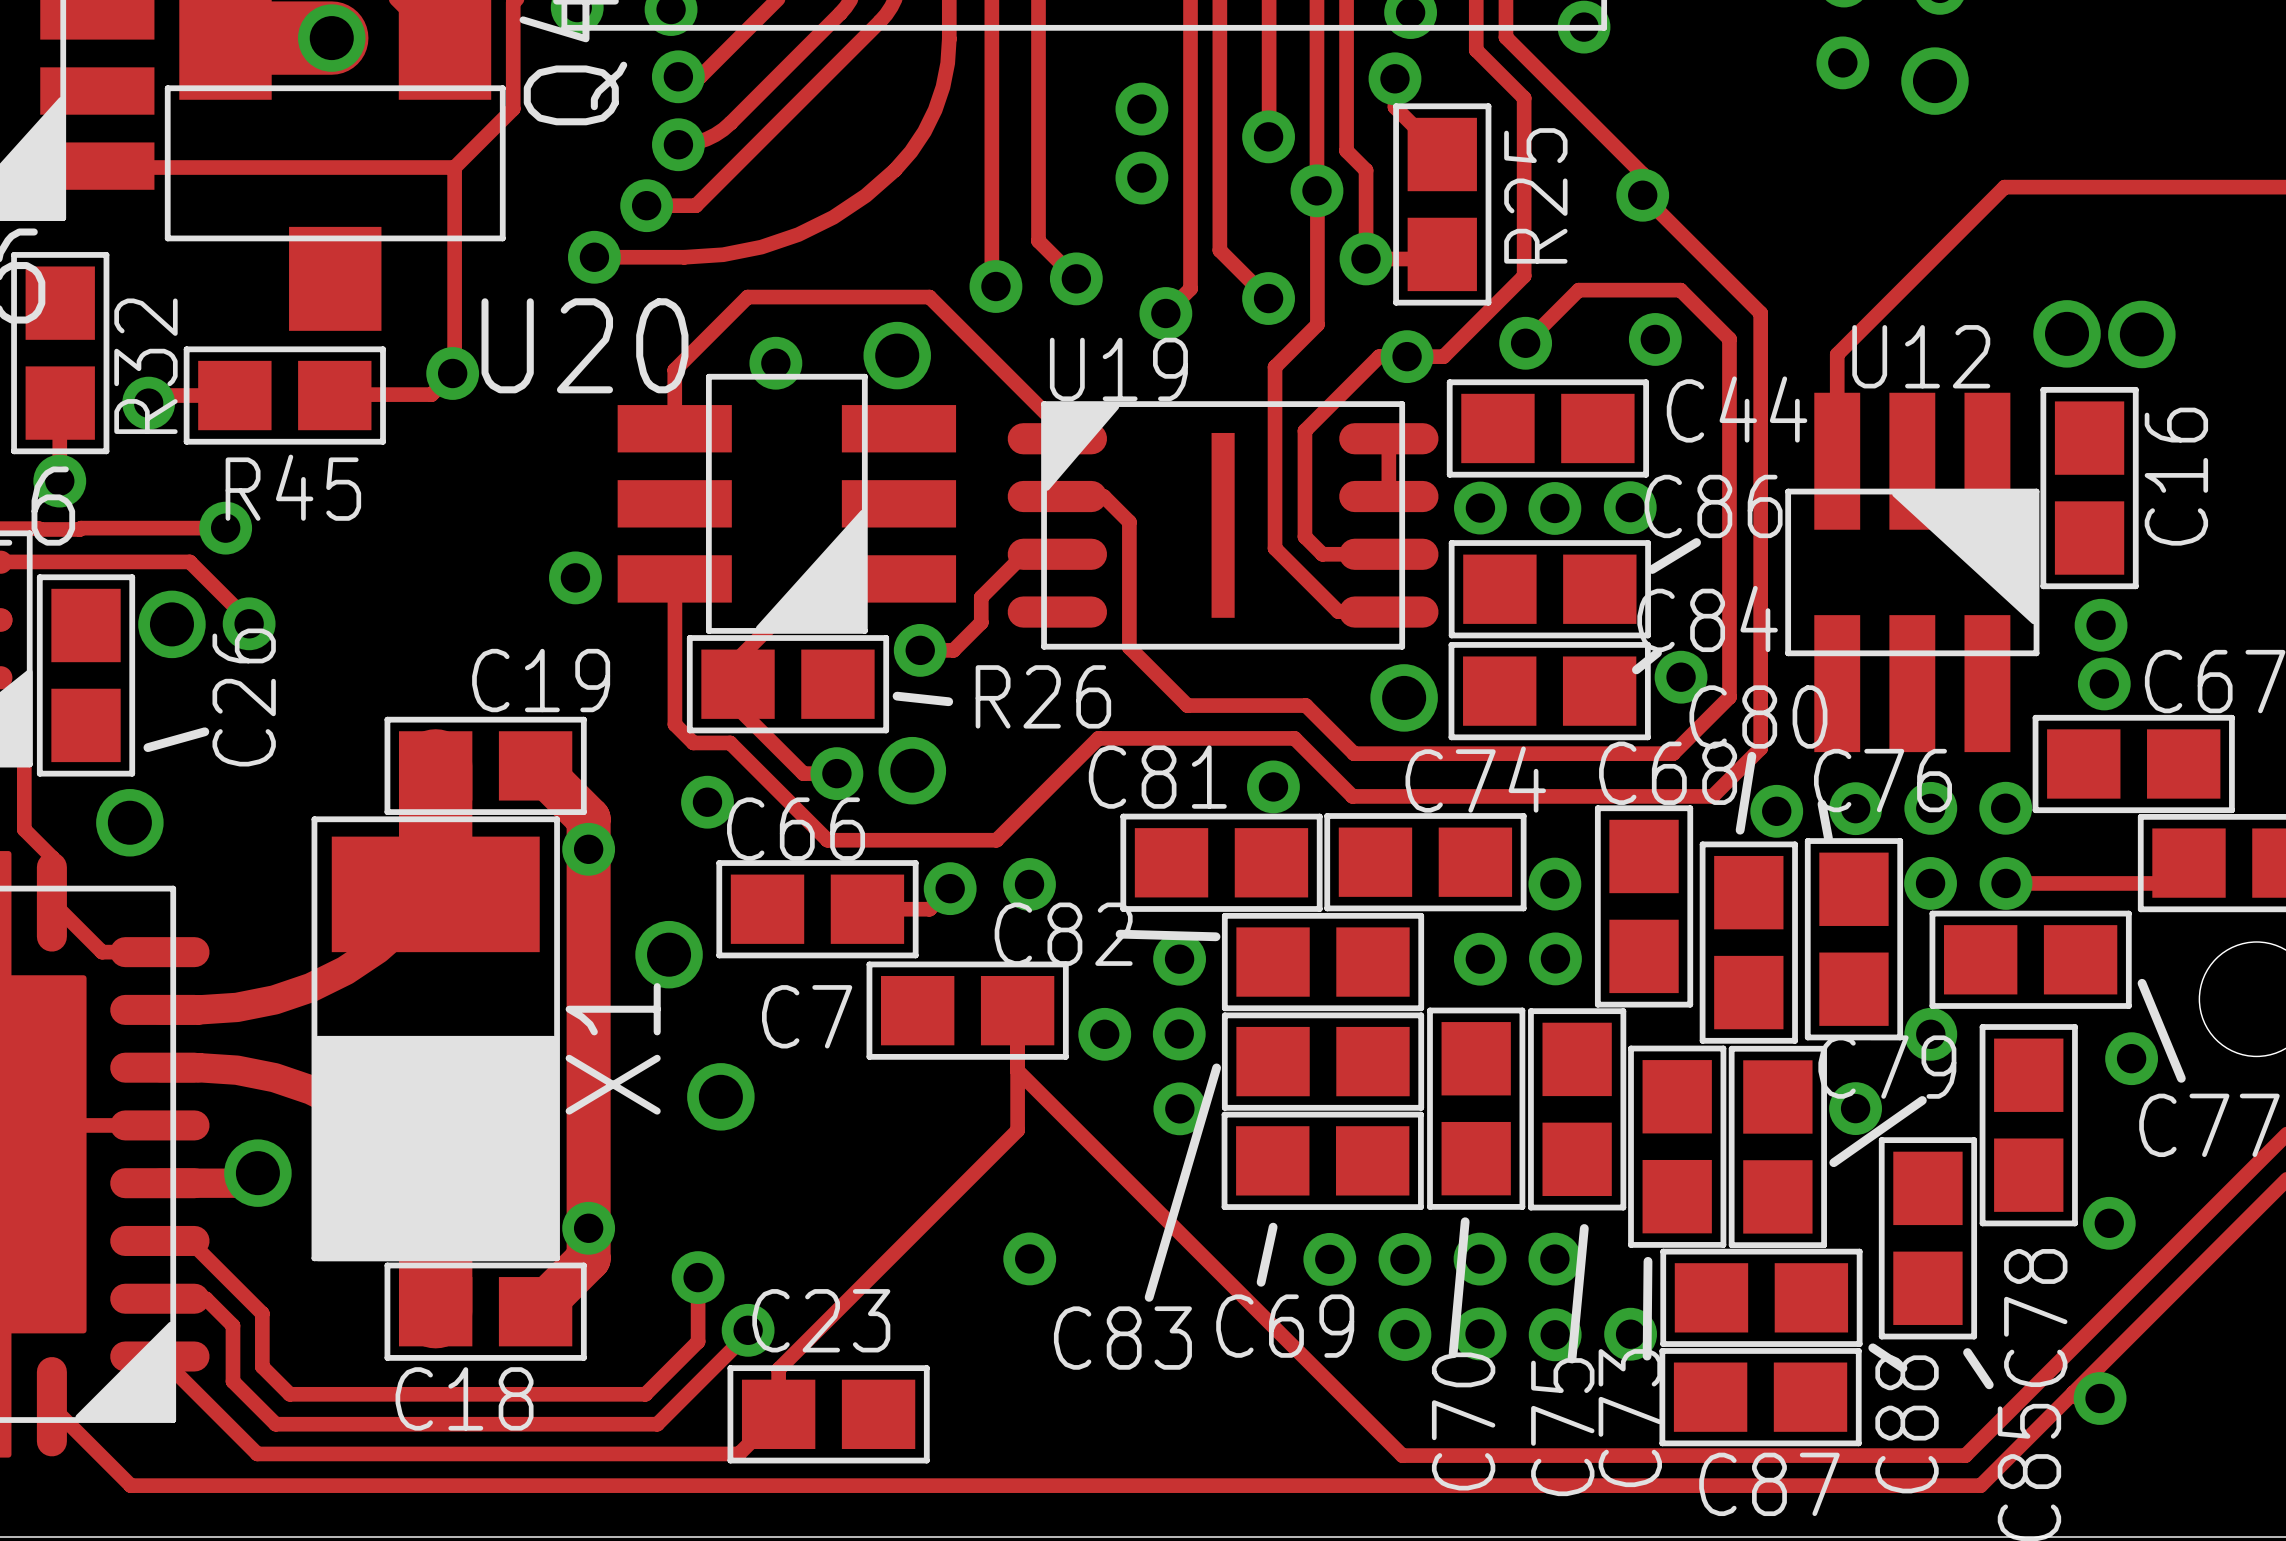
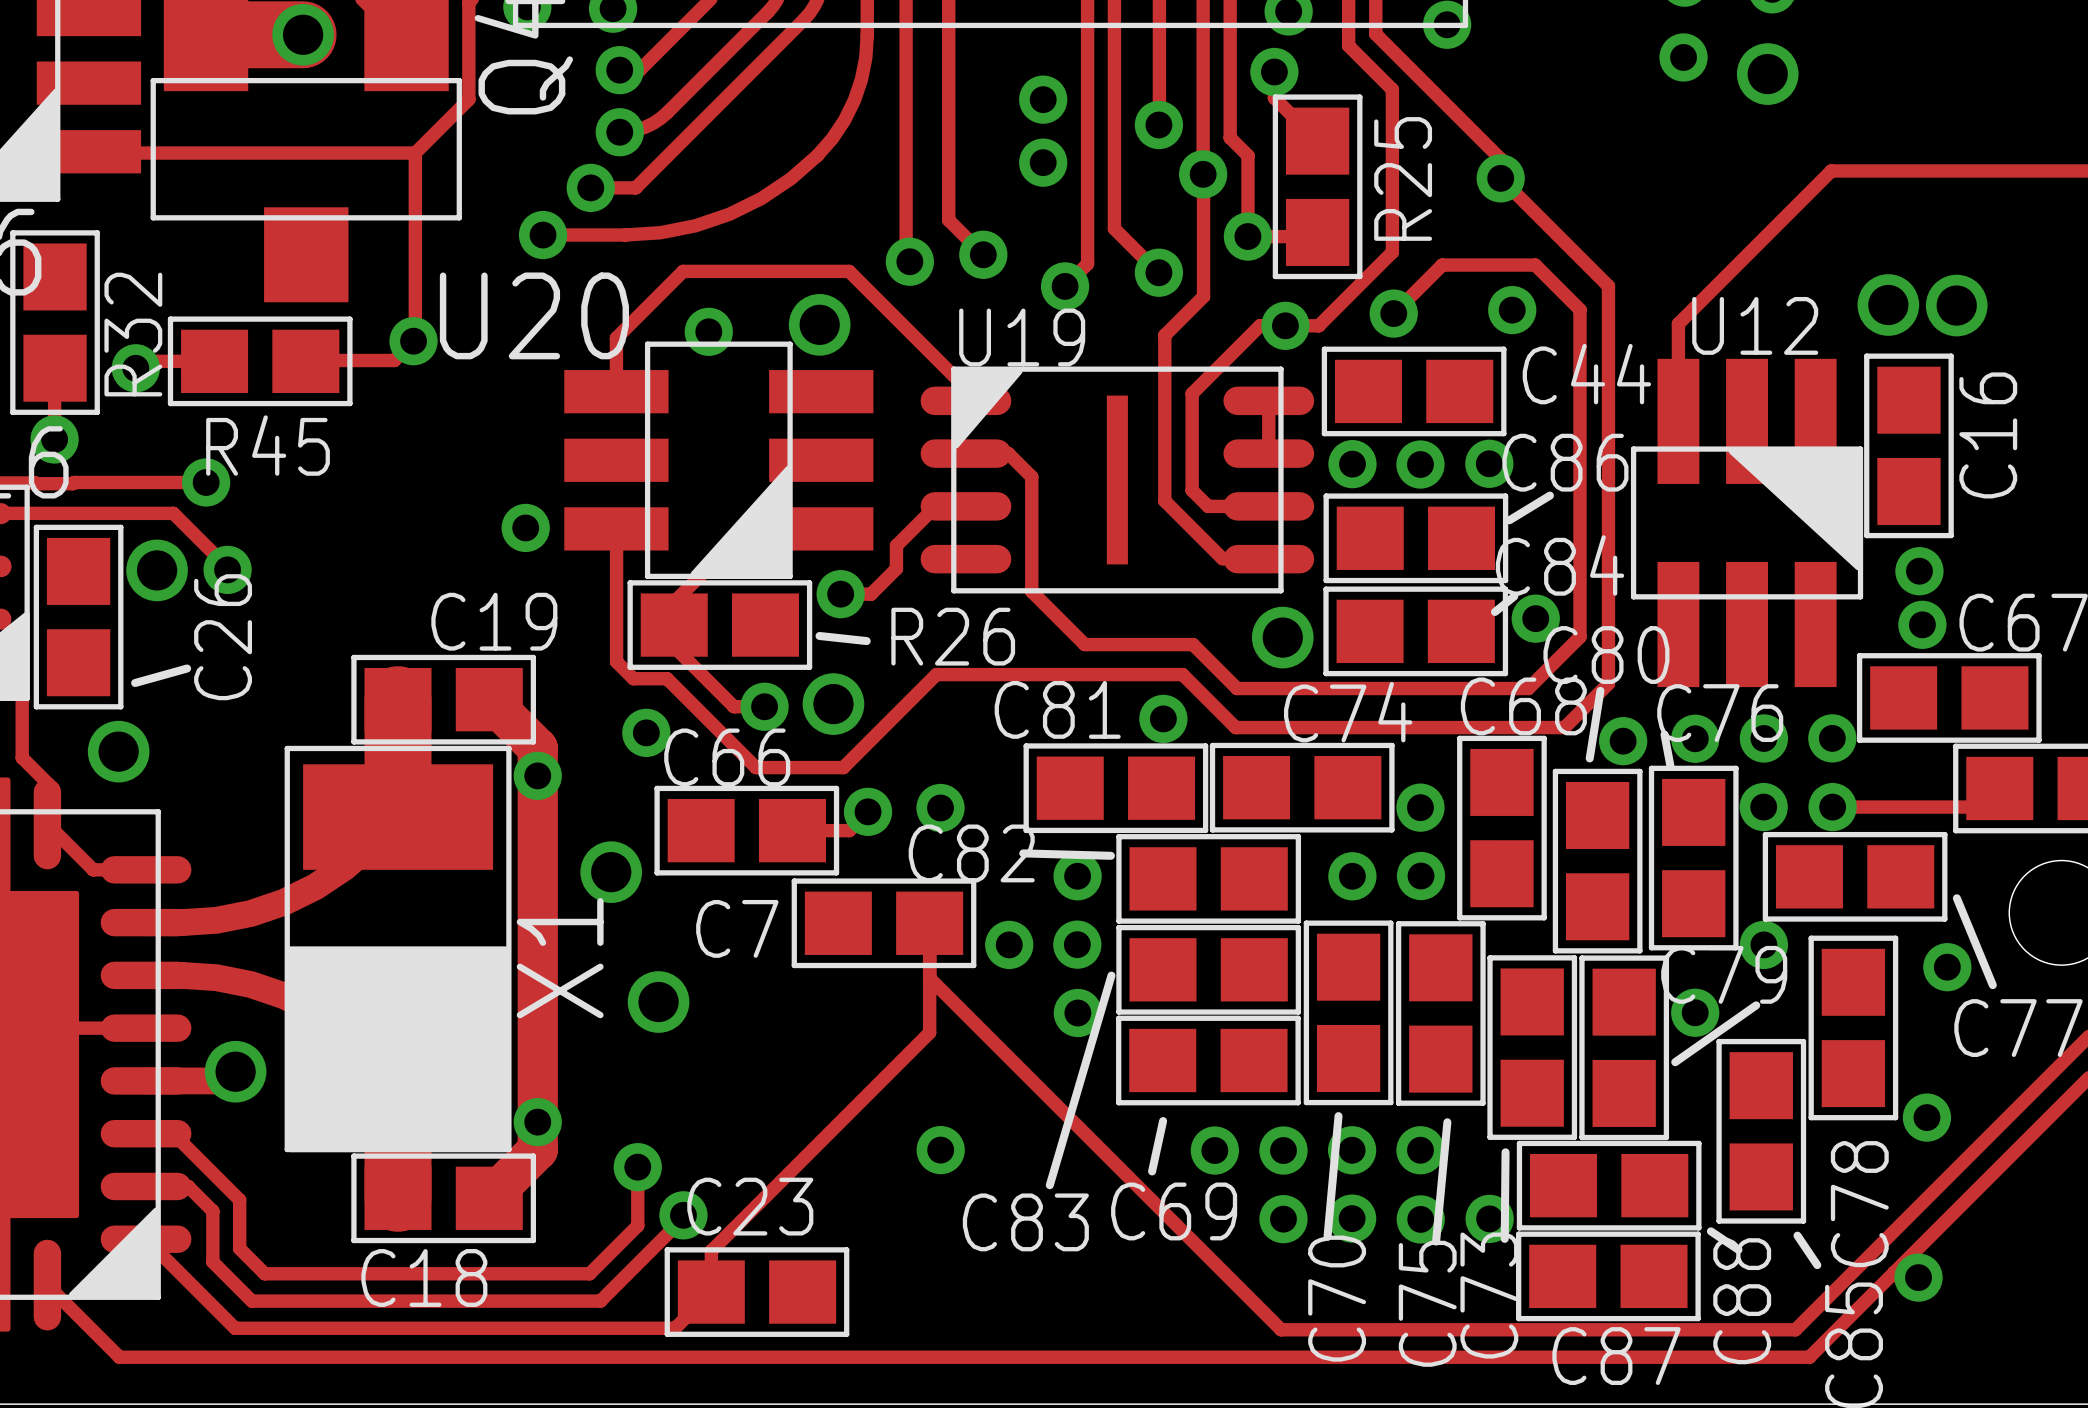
track: (1098, 738) (996, 840) (923, 840) -> (1003, 674) (936, 674) (843, 767)

